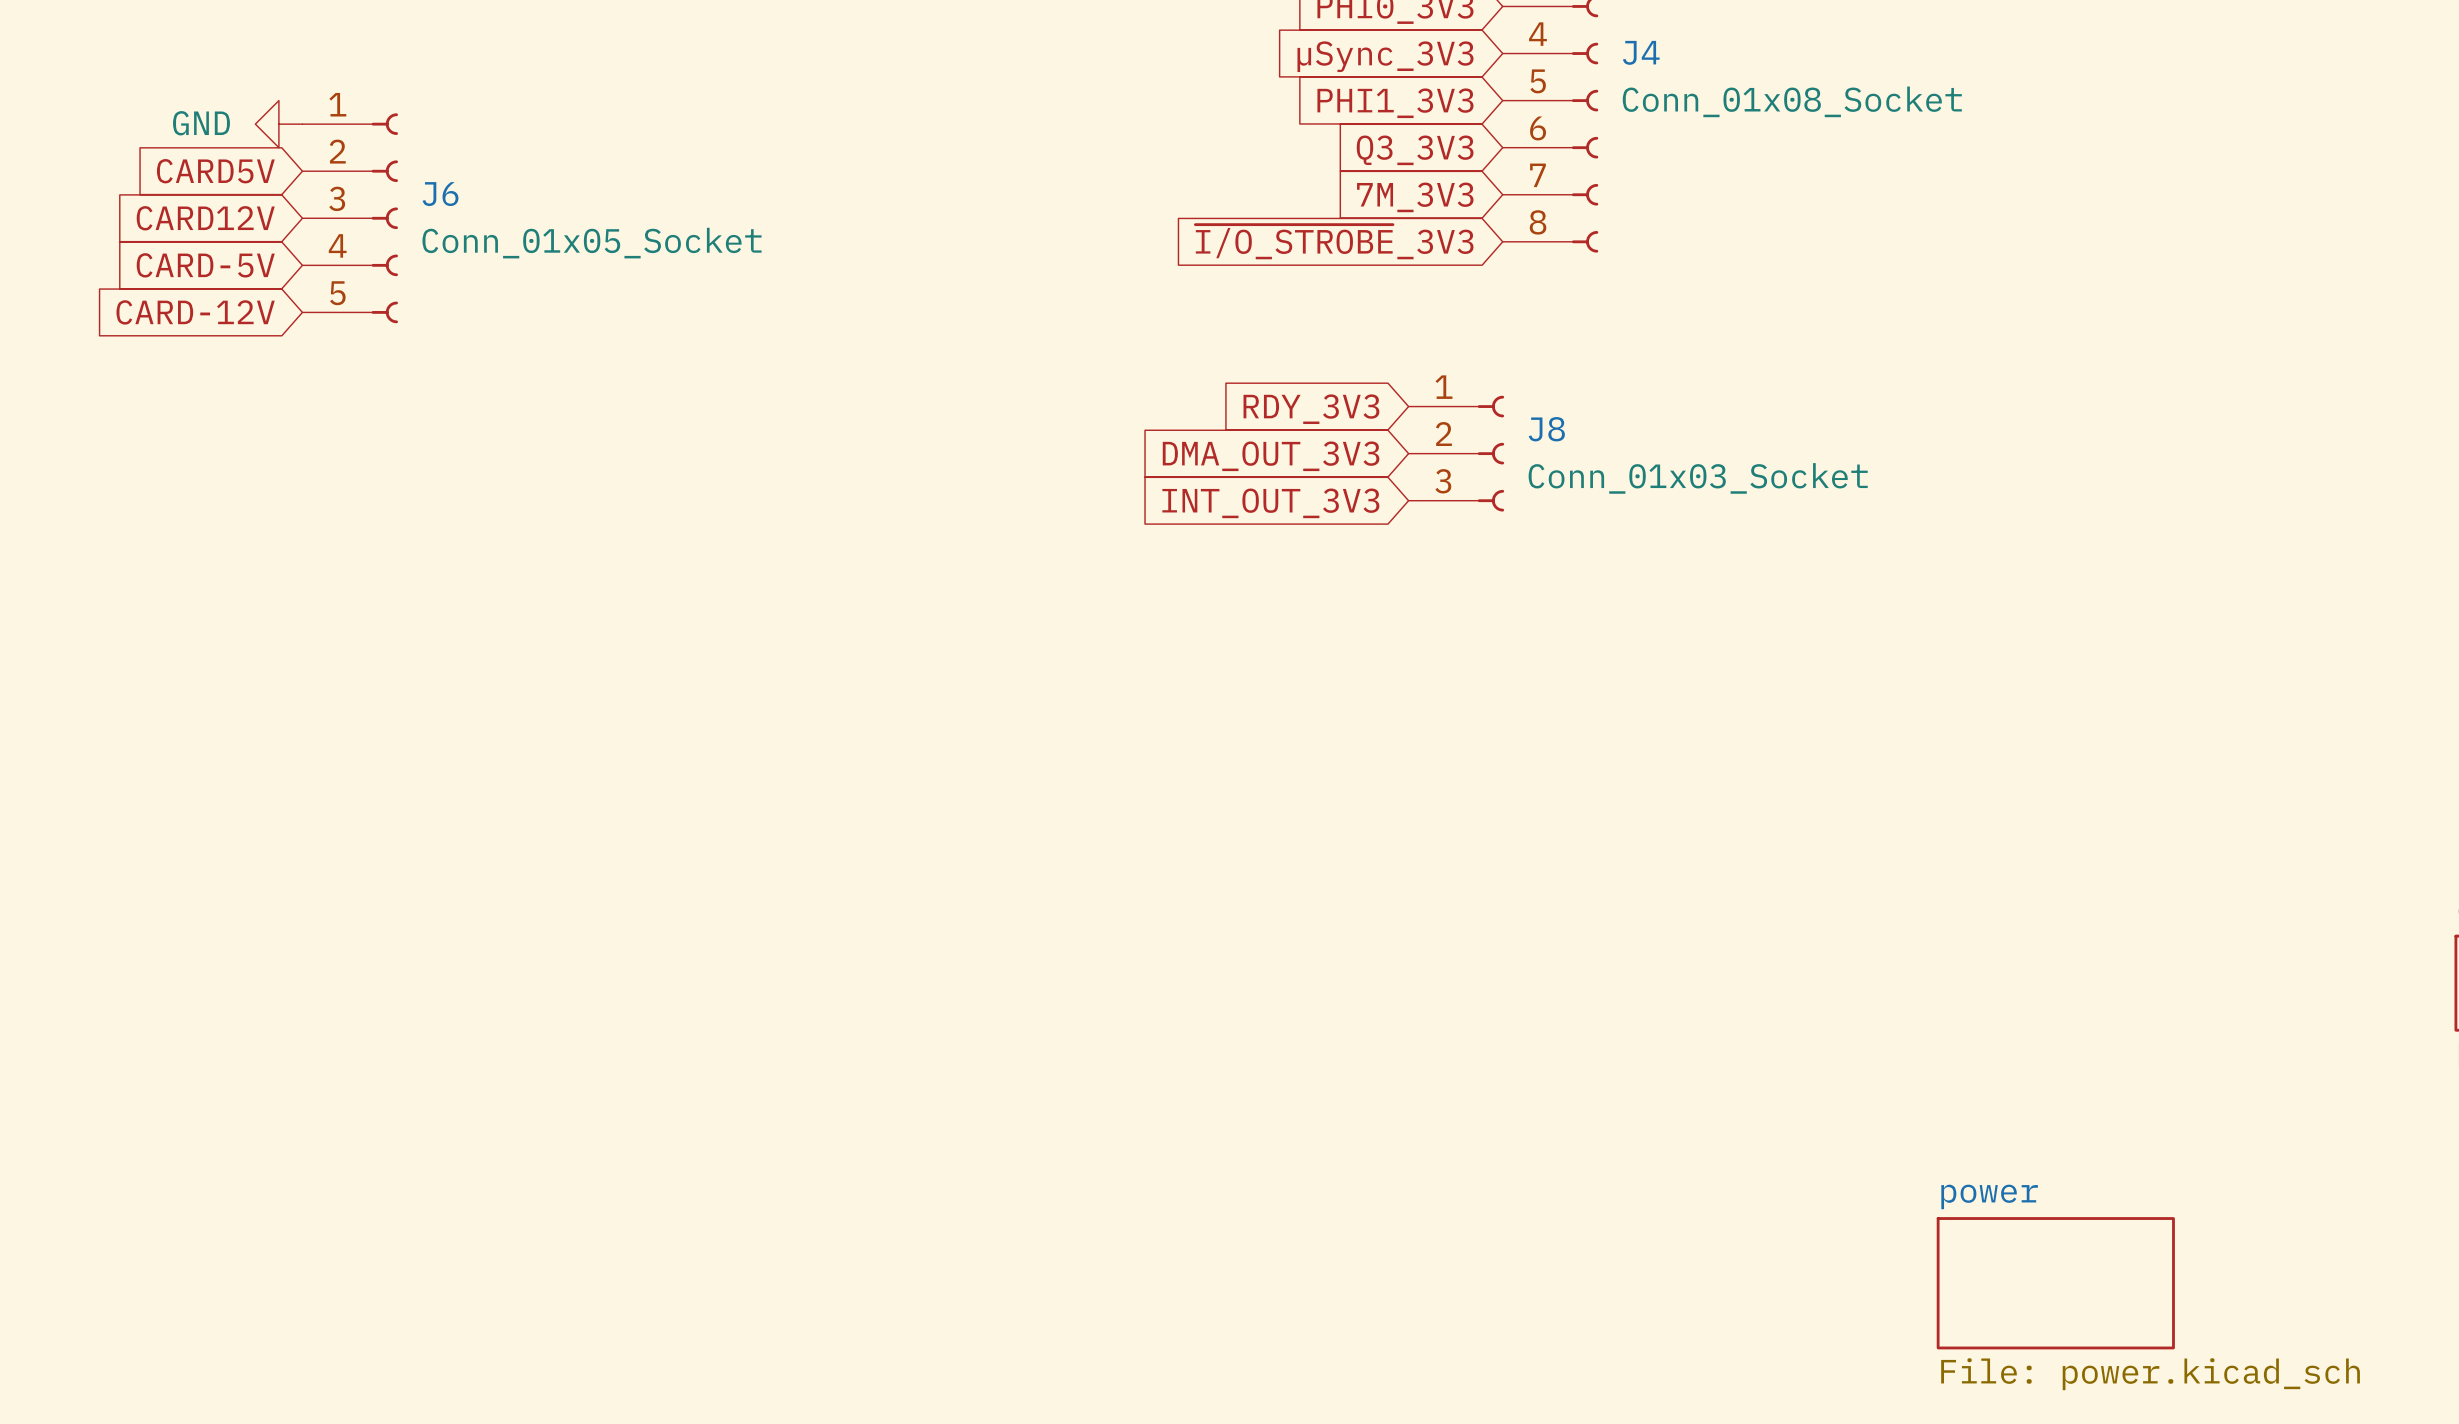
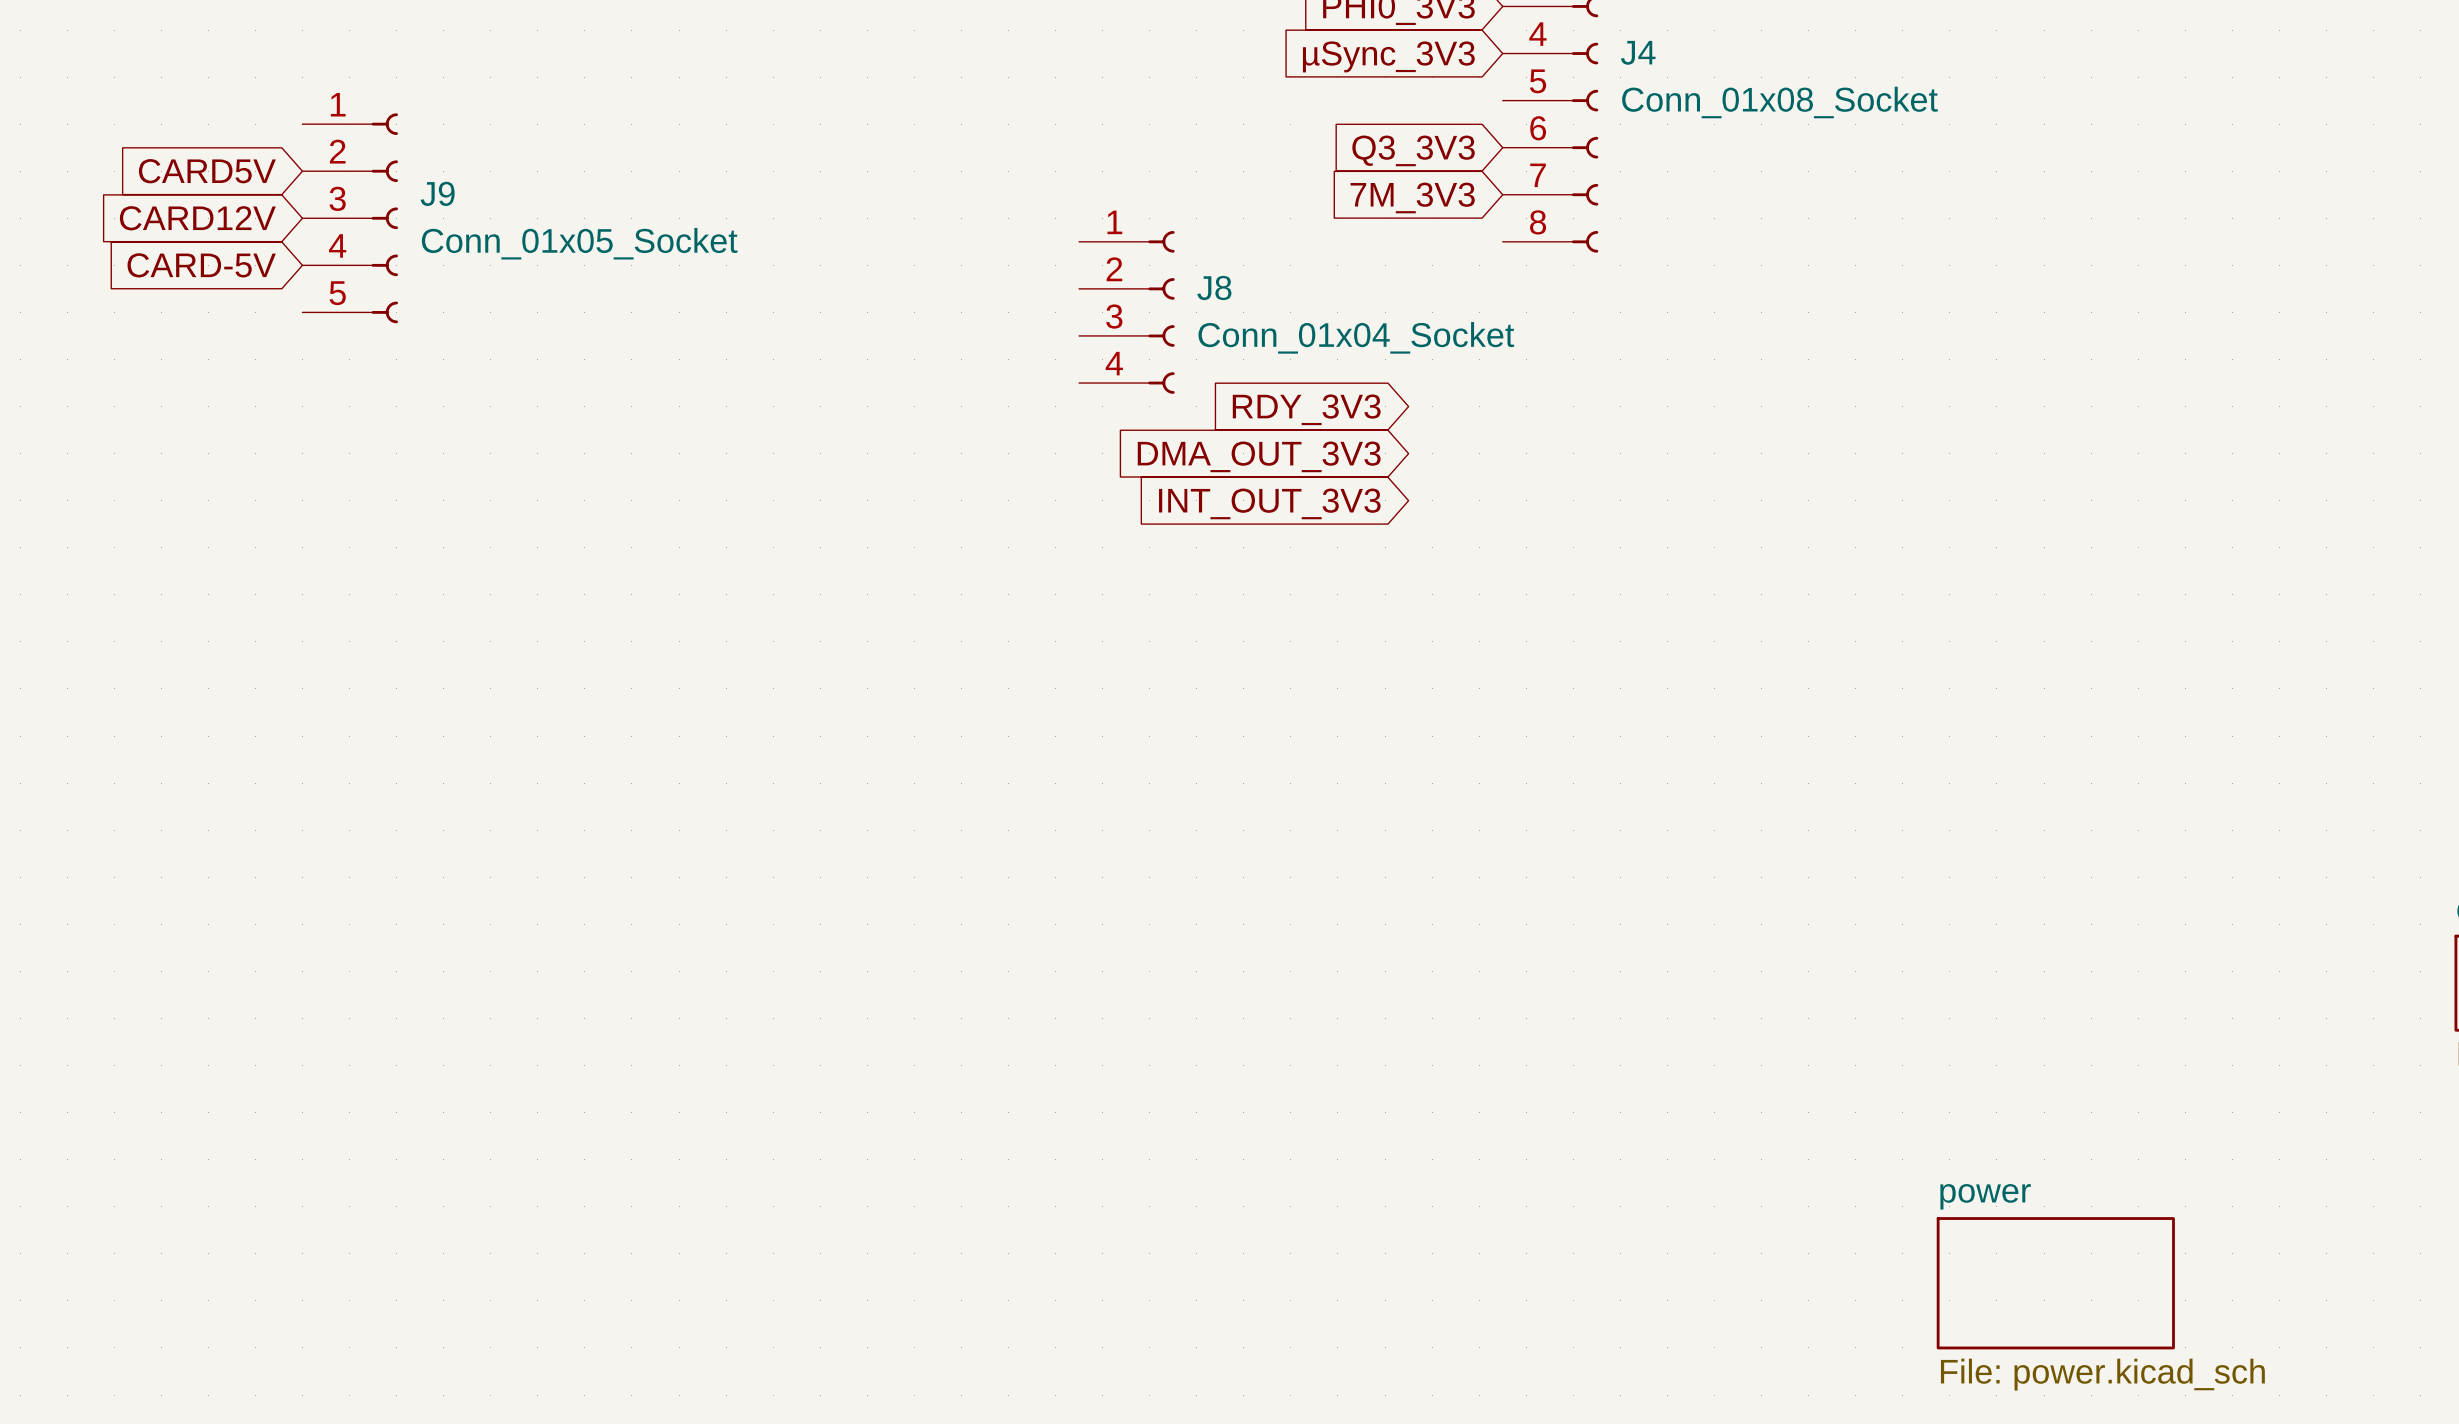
global label: PHI1_3V3 (1395, 103) -> none
power symbol: GND (278, 124) -> none
J6 name: J6 (440, 194) -> J9 (437, 193)
global label: ~{I/O_STROBE}_3V3 (1334, 241) -> none
global label: CARD-12V (195, 312) -> none
J8 symbol: [1408, 395, 1505, 512] -> [1079, 230, 1175, 394]
J8 value: Conn_01x03_Socket (1698, 478) -> Conn_01x04_Socket (1356, 337)

